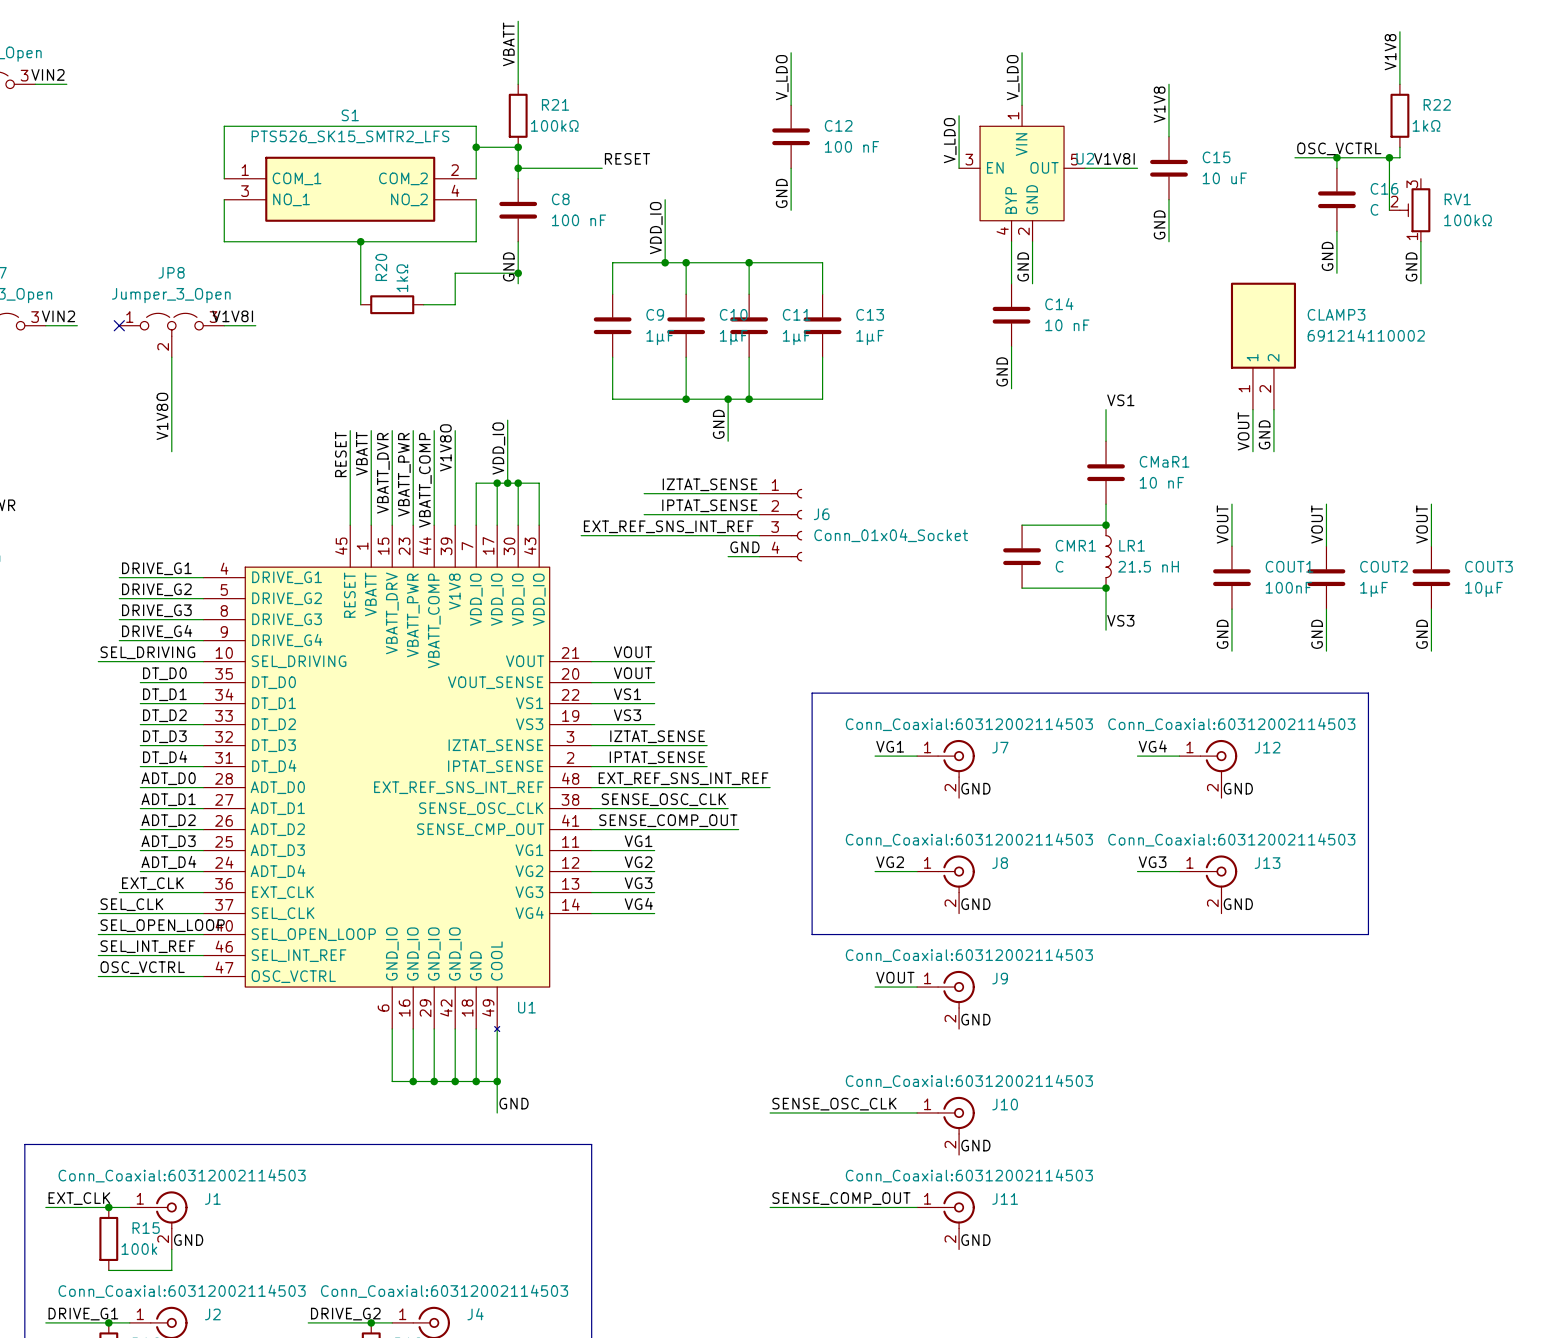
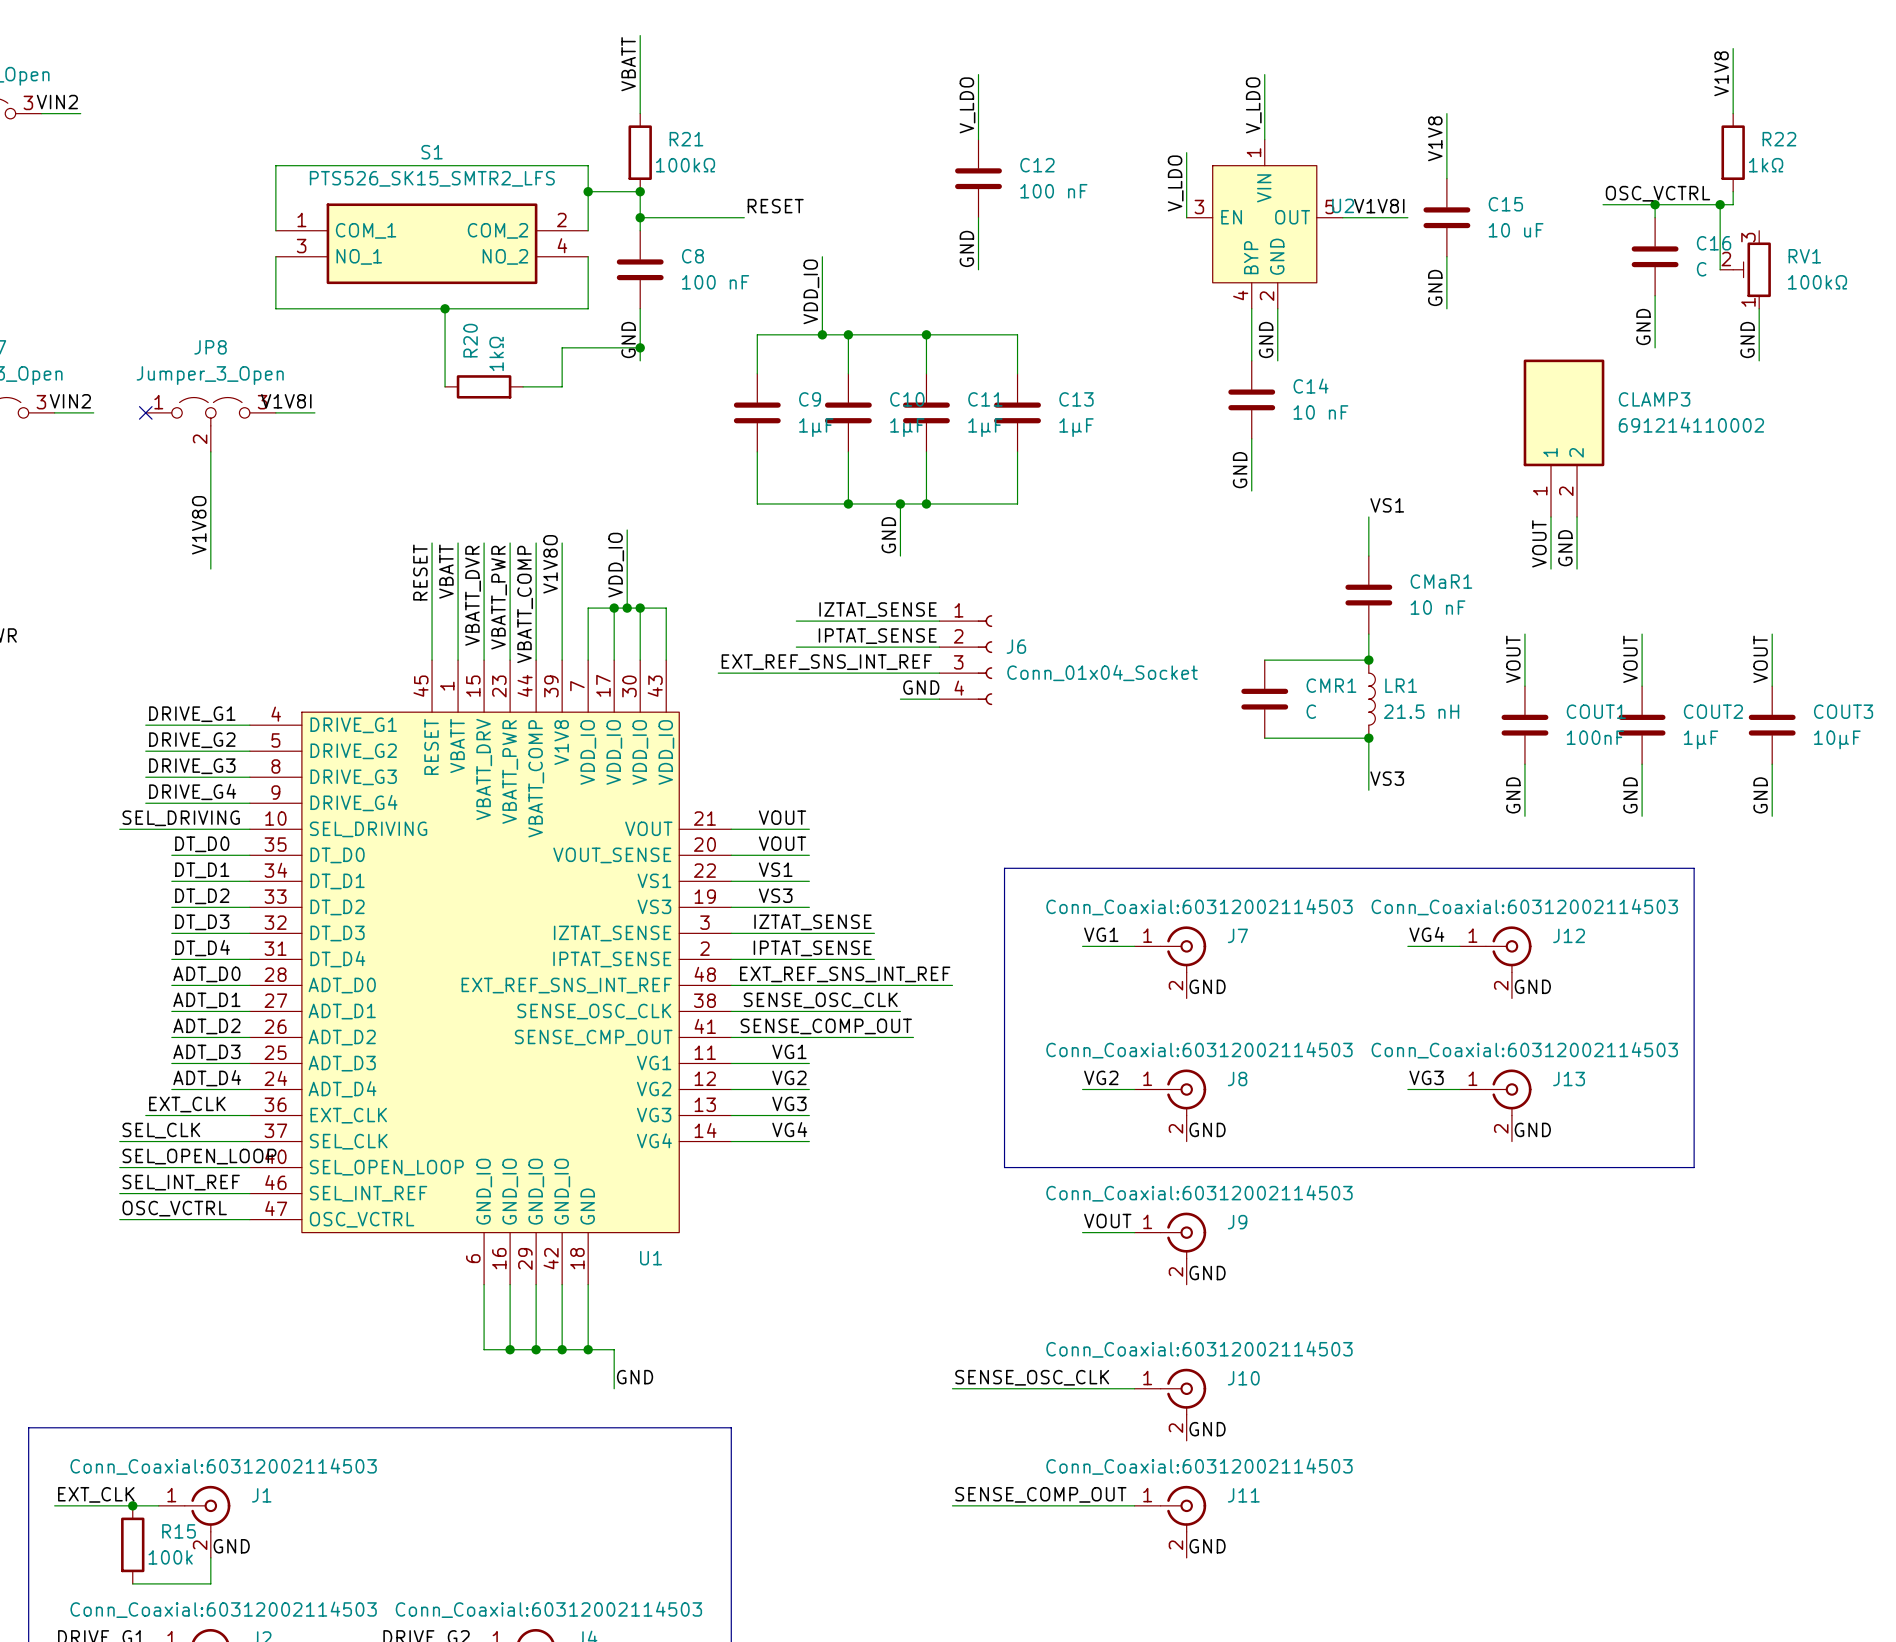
U1 symbol: [203, 525, 592, 1032] -> [249, 660, 732, 1285]
wire: (497, 1029) (497, 1081) -> none
junction: (497, 1081) -> none

